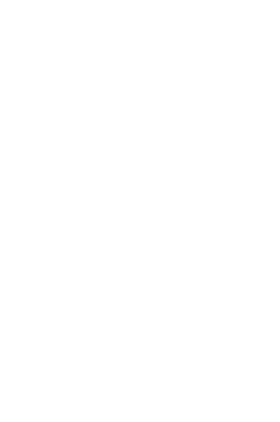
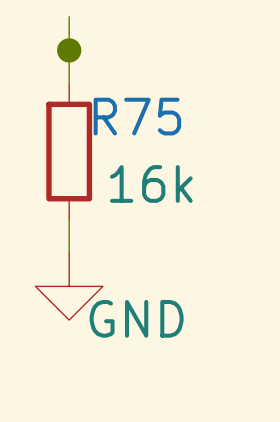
wire: none -> (69, 16) (69, 84)
junction: none -> (69, 50)
R75: none -> 16k (69, 151)
wire: none -> (69, 218) (69, 252)
power symbol: none -> GND (69, 286)

